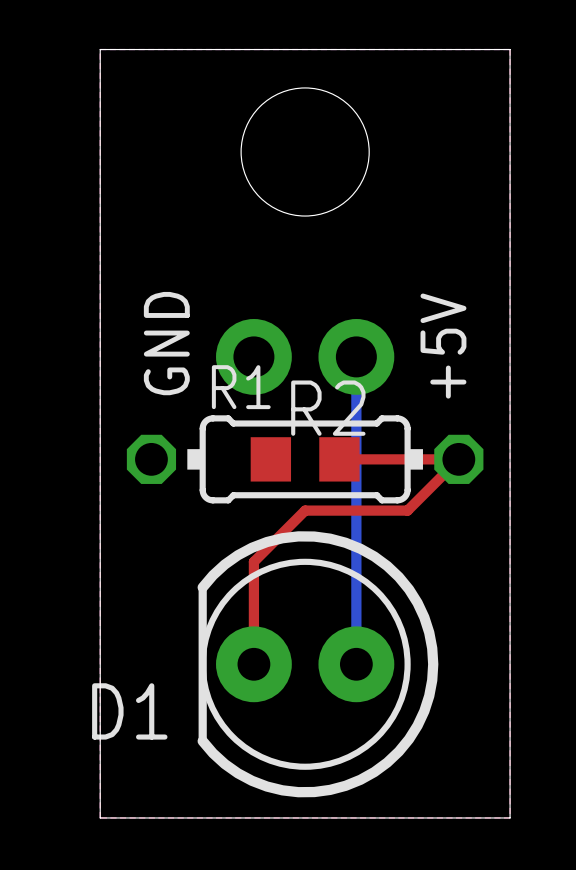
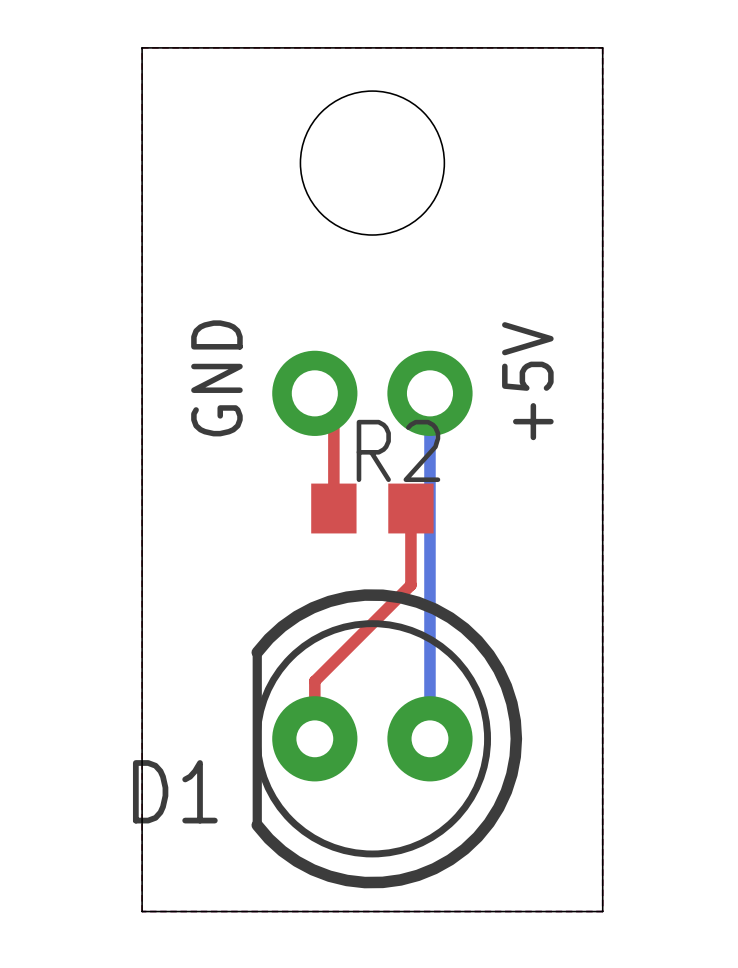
top track: none -> (314, 393) (333, 412) (333, 508)
R1: (305, 459) -> none
top track: (339, 459) (458, 459) (407, 510) (305, 510) (253, 561) (253, 613) -> (410, 508) (410, 585) (314, 681)

